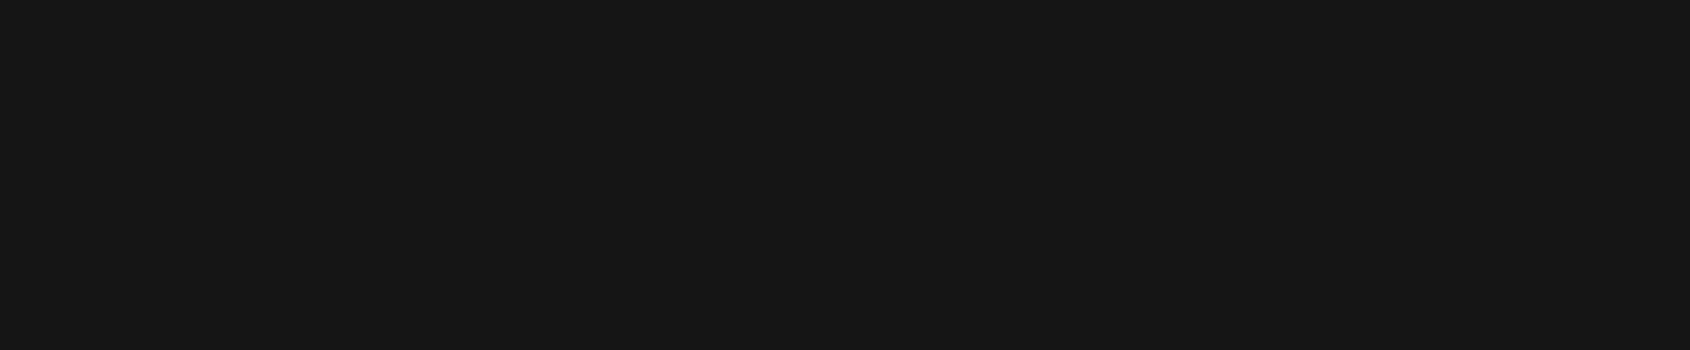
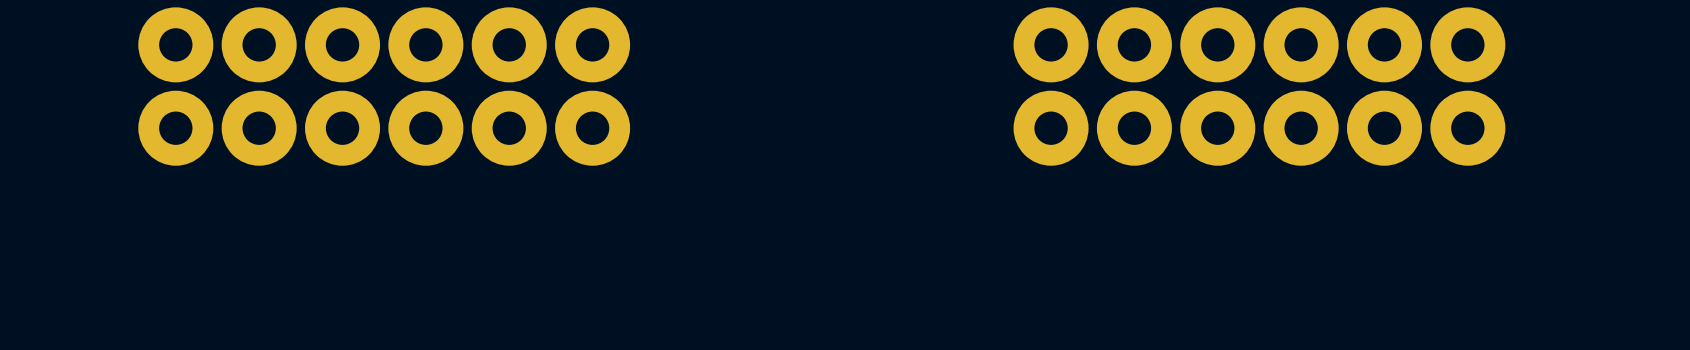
part: none -> (384, 86)
part: none -> (1259, 86)

